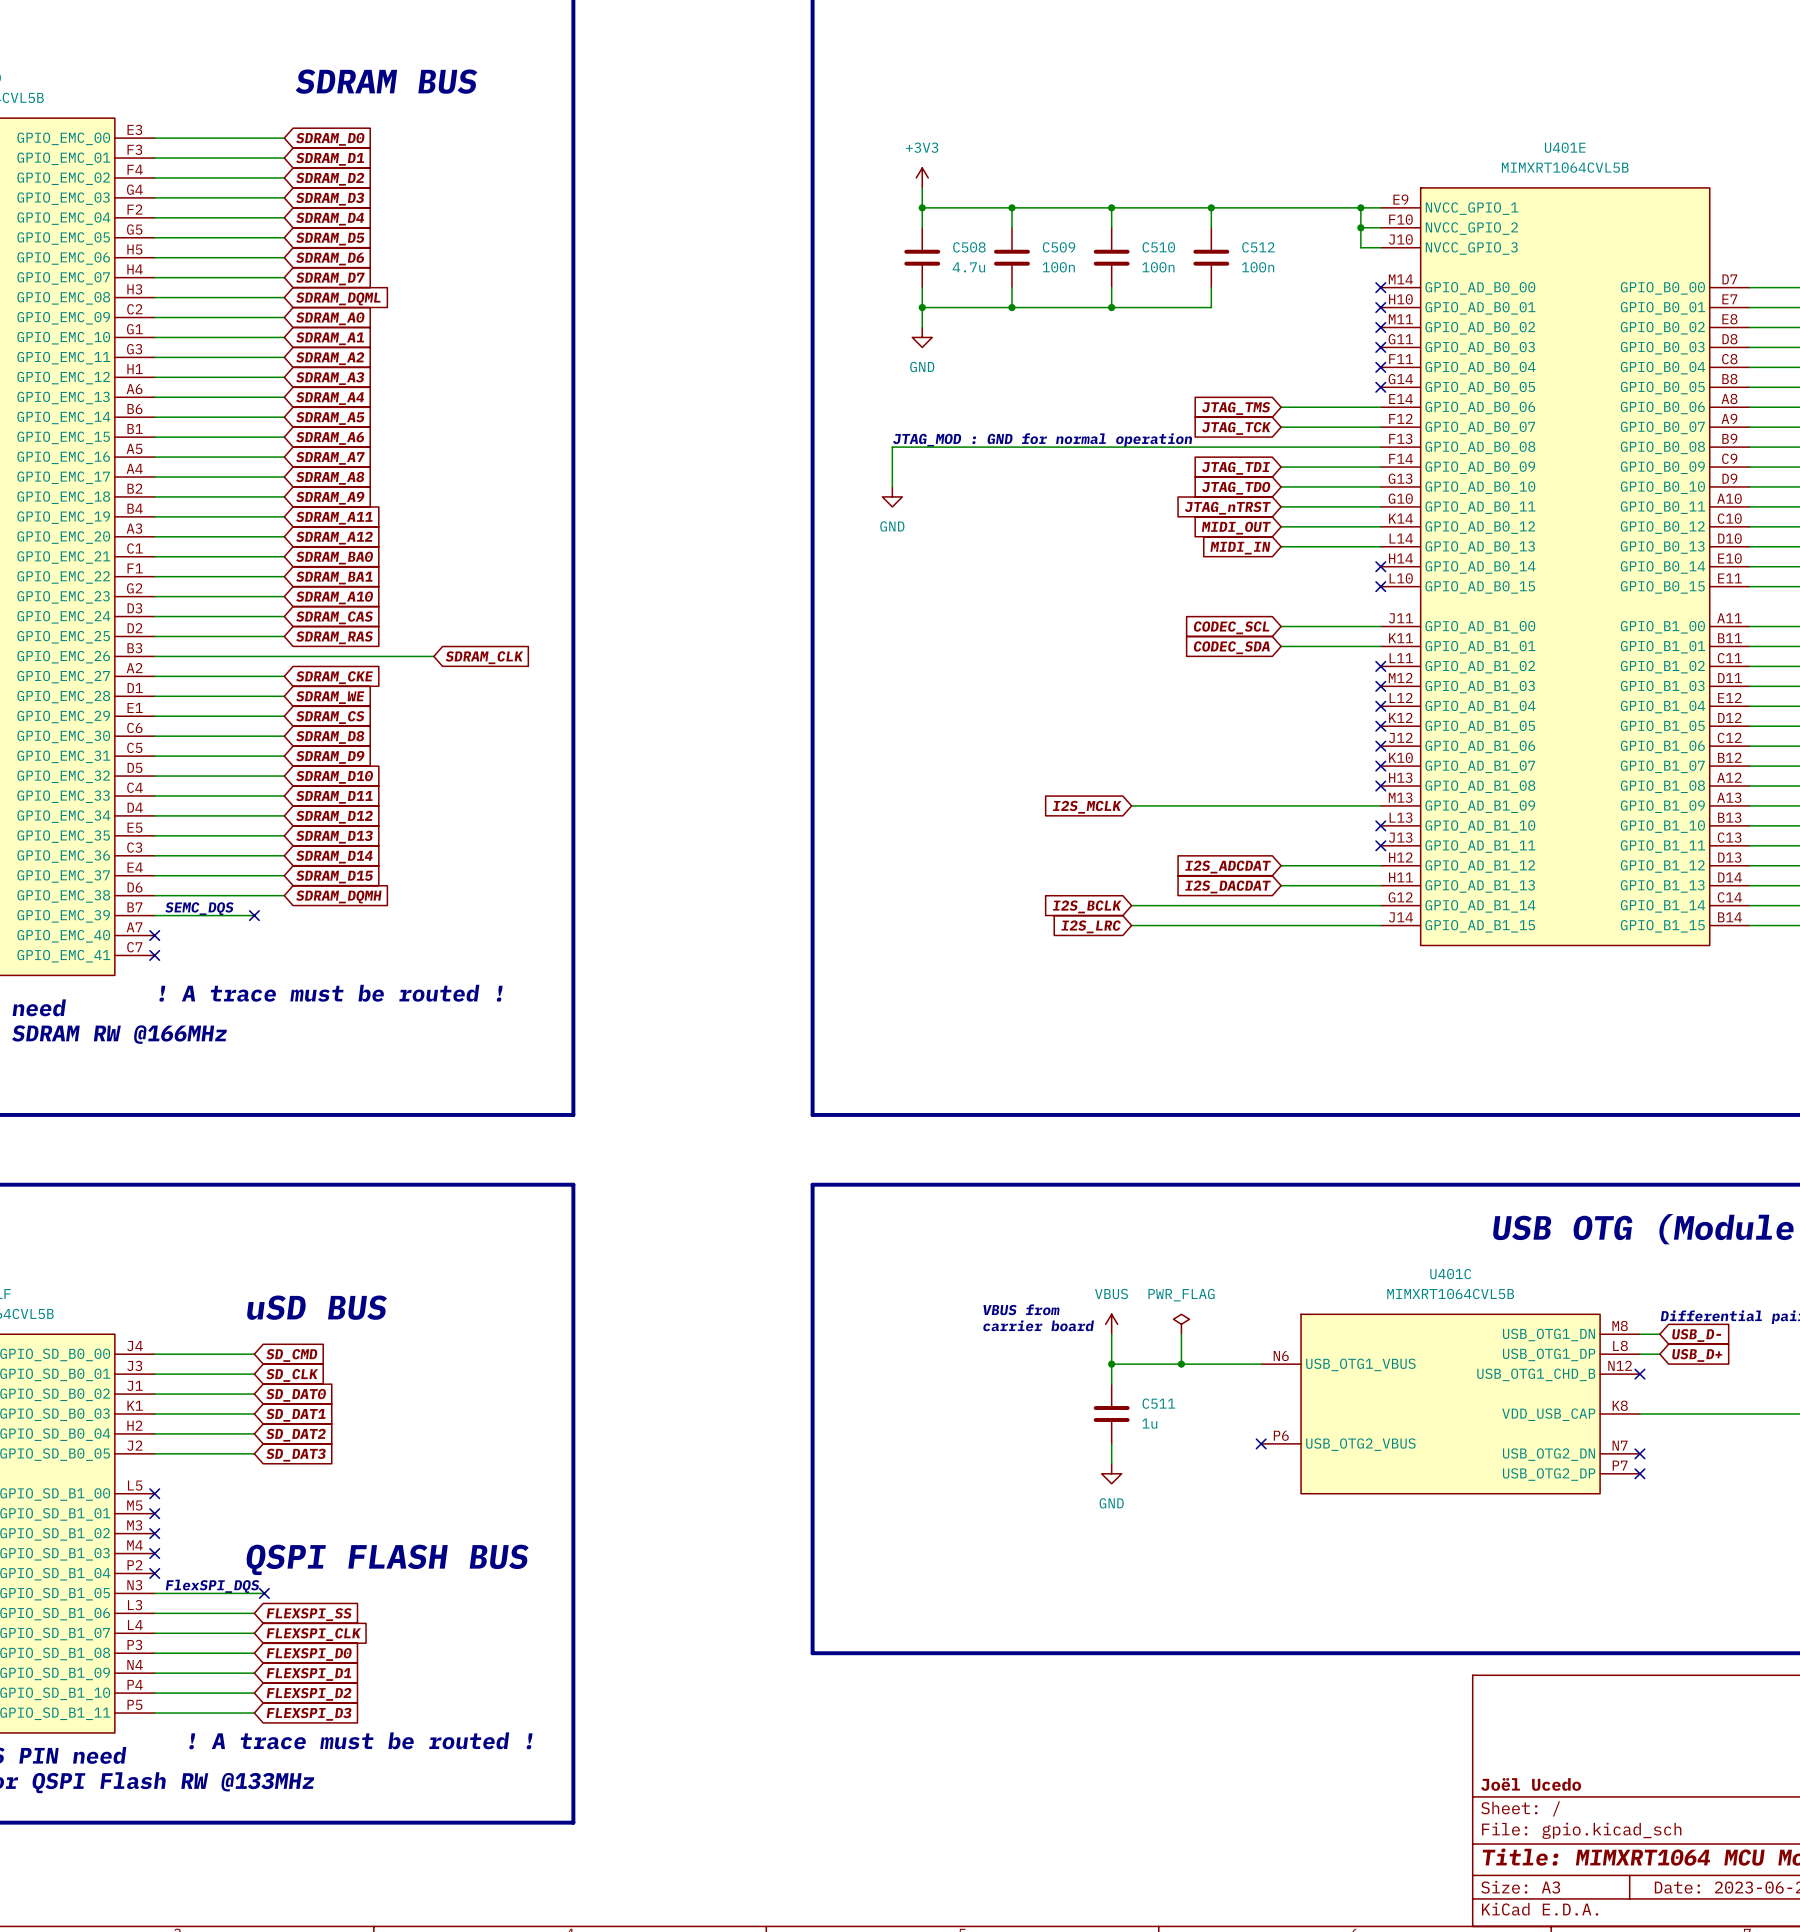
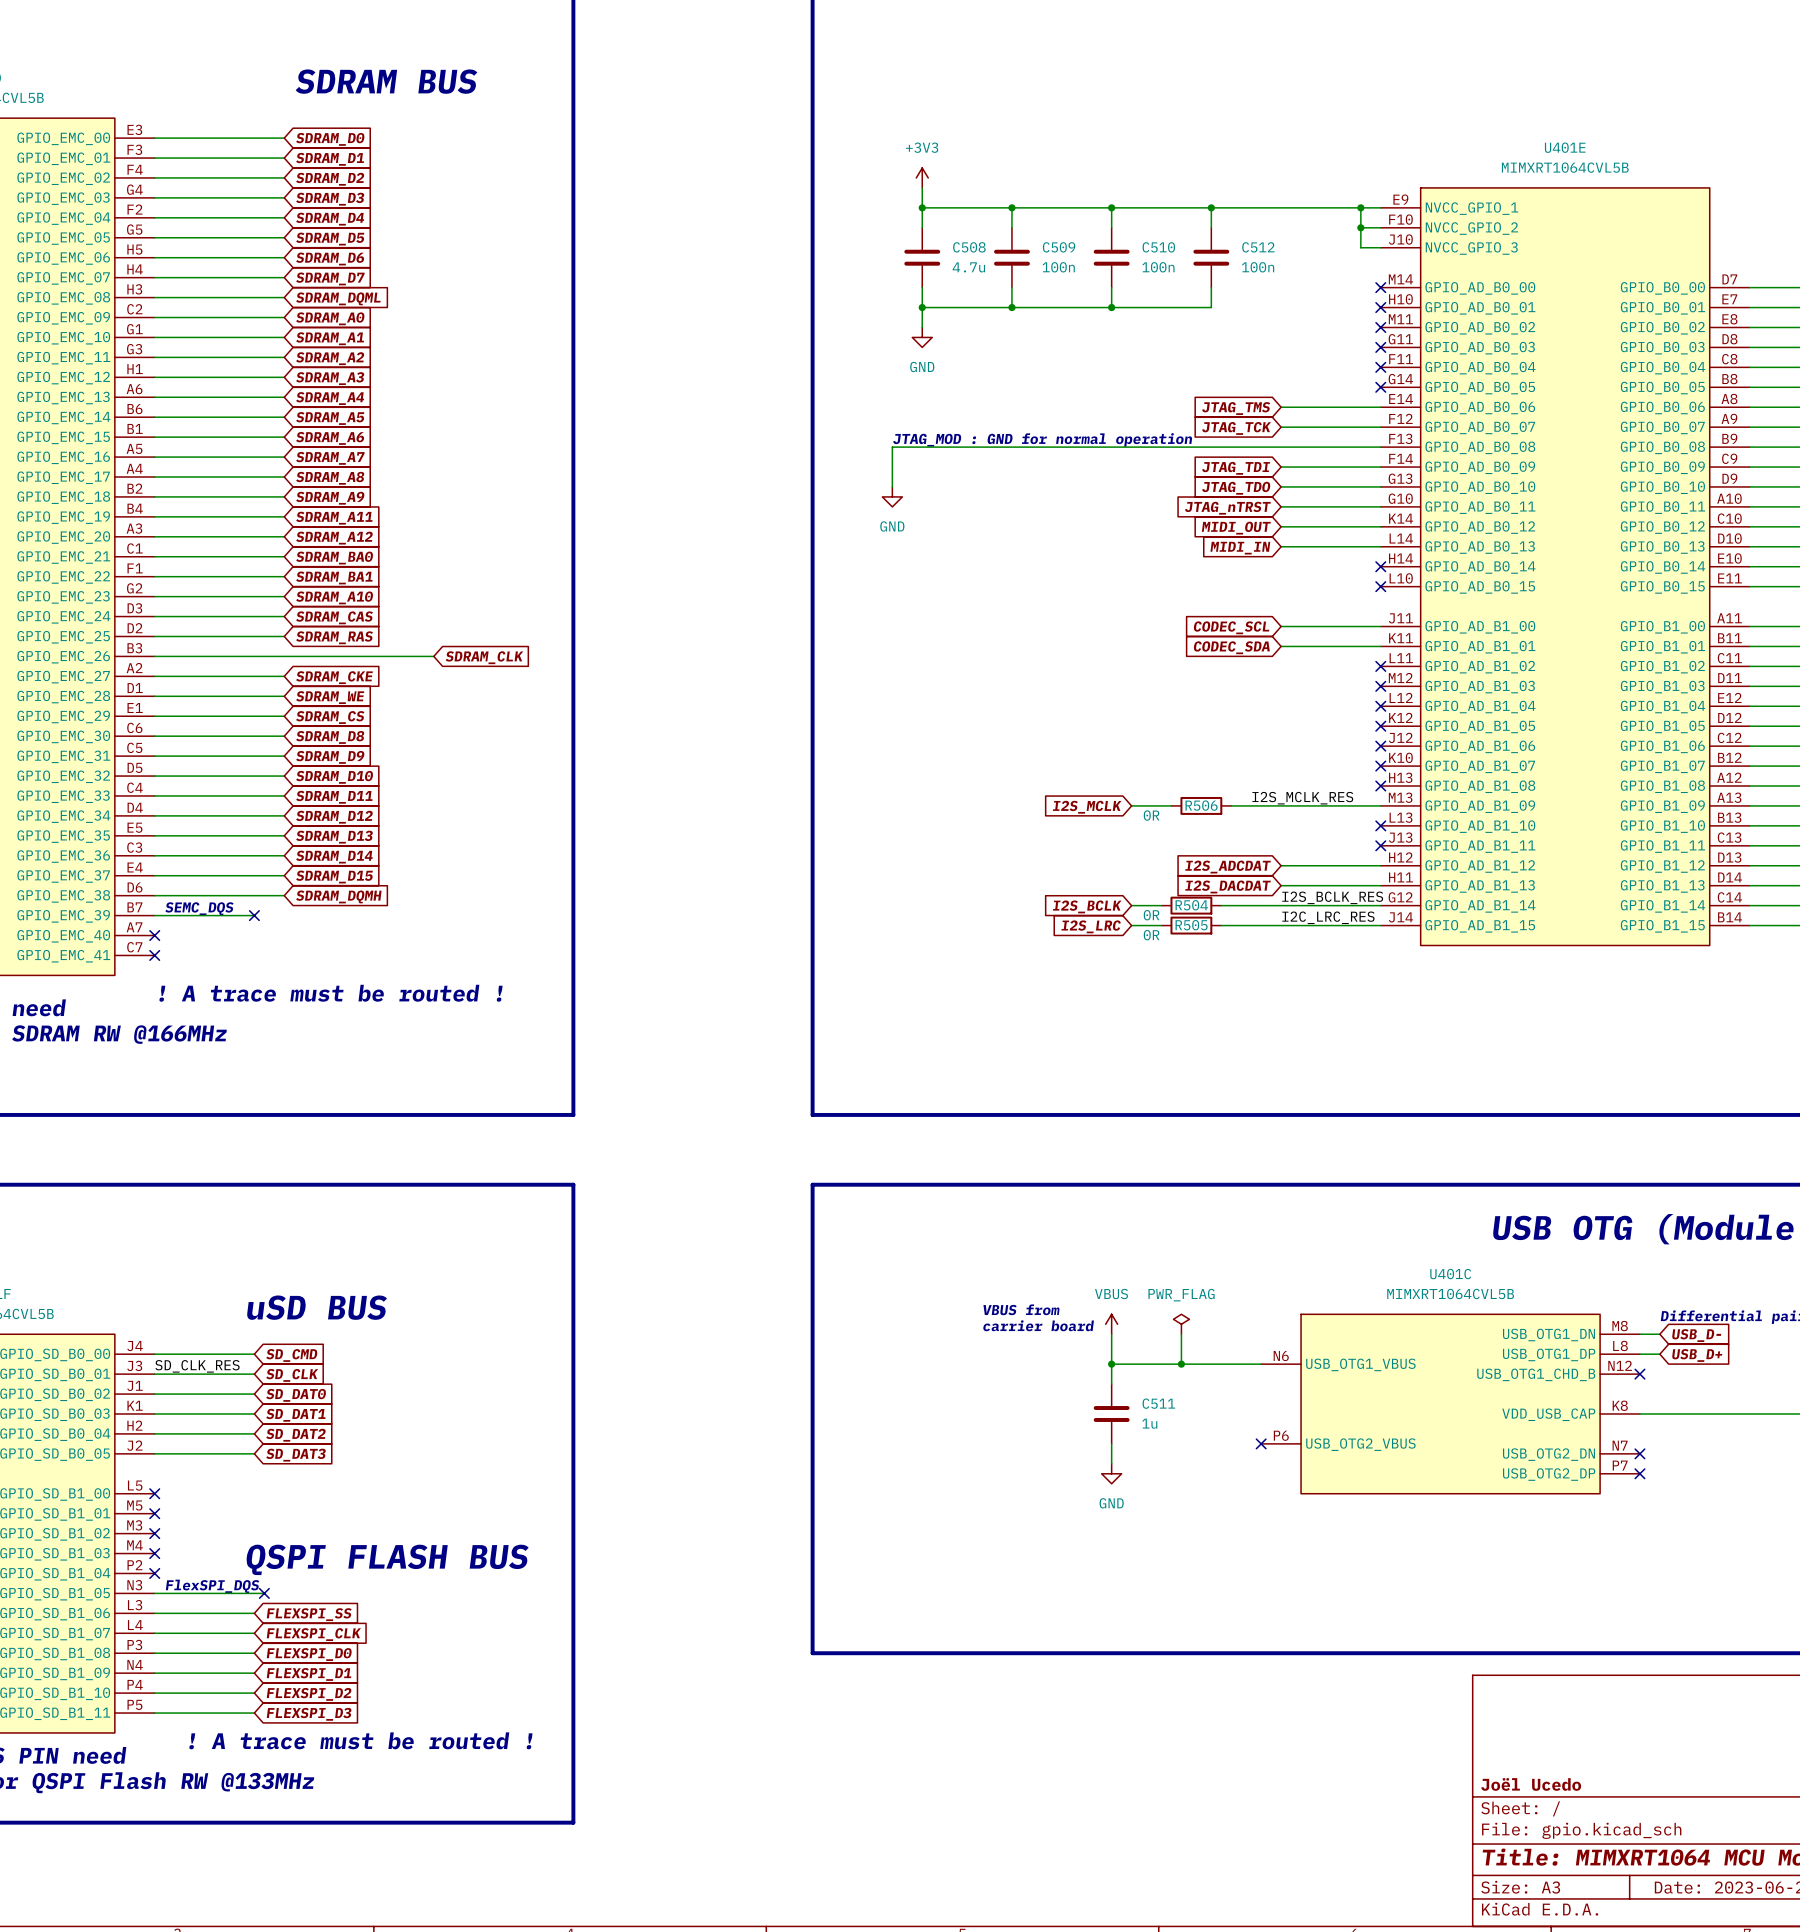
label: none -> I2S_MCLK_RES (1302, 798)
R506: none -> 0R (1201, 805)
label: none -> I2S_BCLK_RES (1332, 897)
R504: none -> 0R (1191, 905)
label: none -> I2C_LRC_RES (1328, 917)
R505: none -> 0R (1191, 925)
label: none -> SD_CLK_RES (197, 1366)

